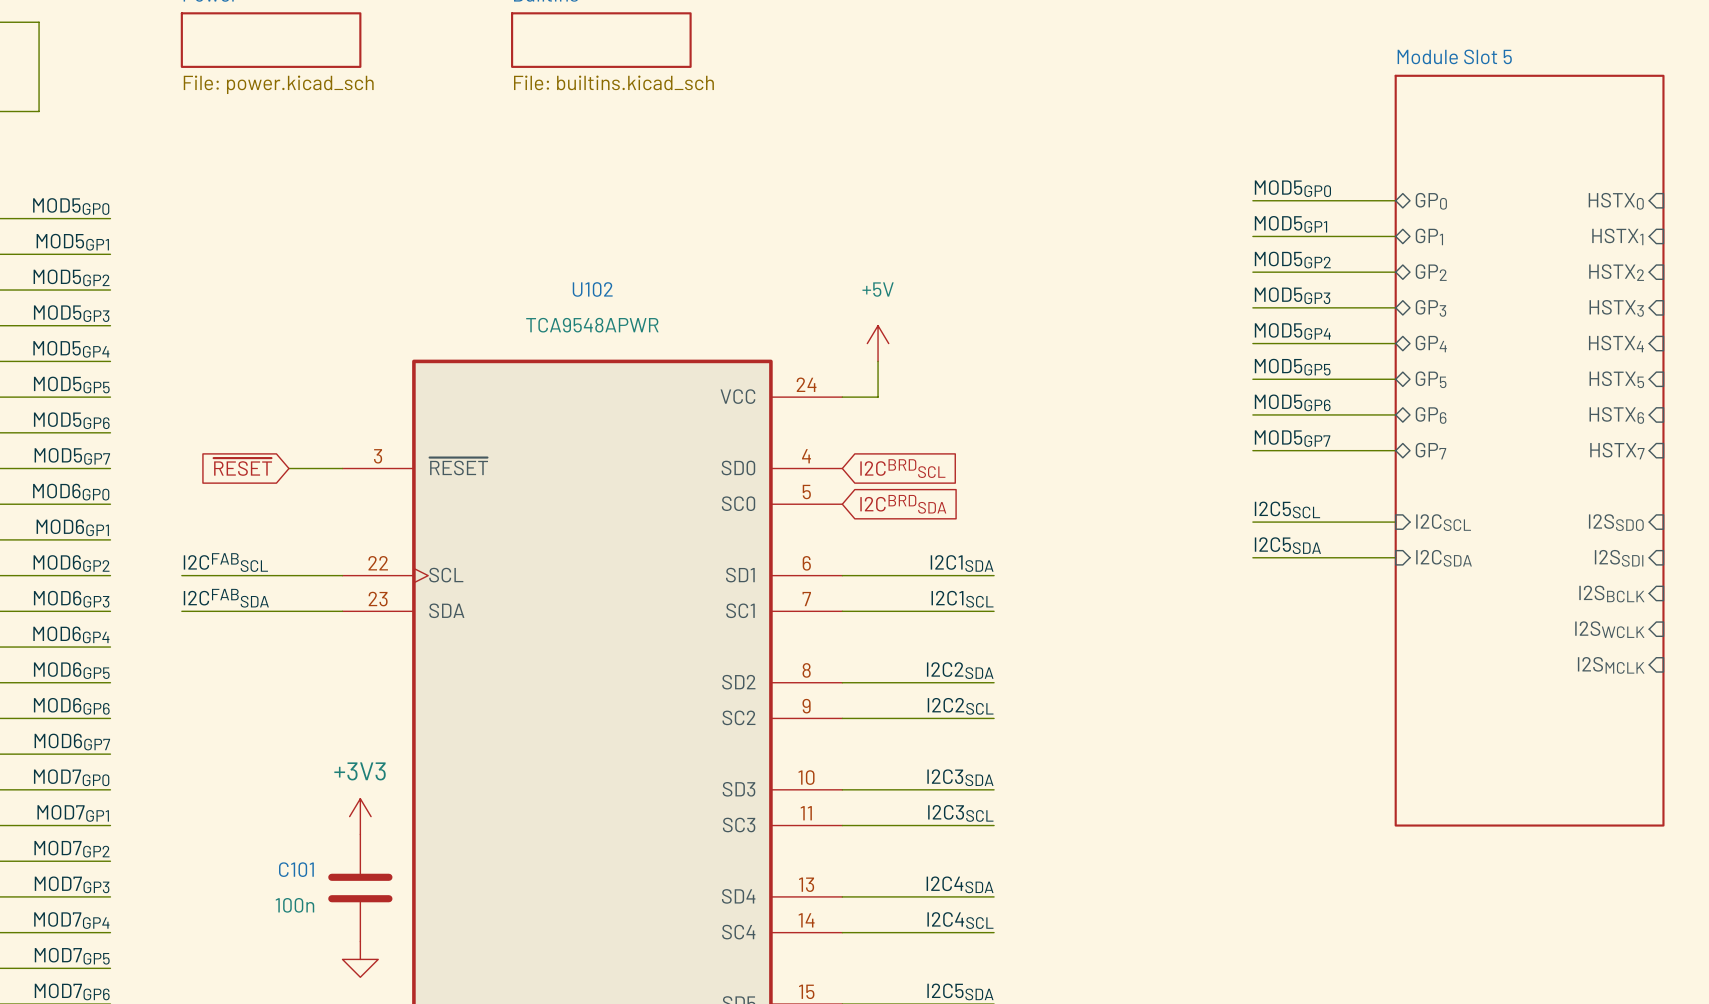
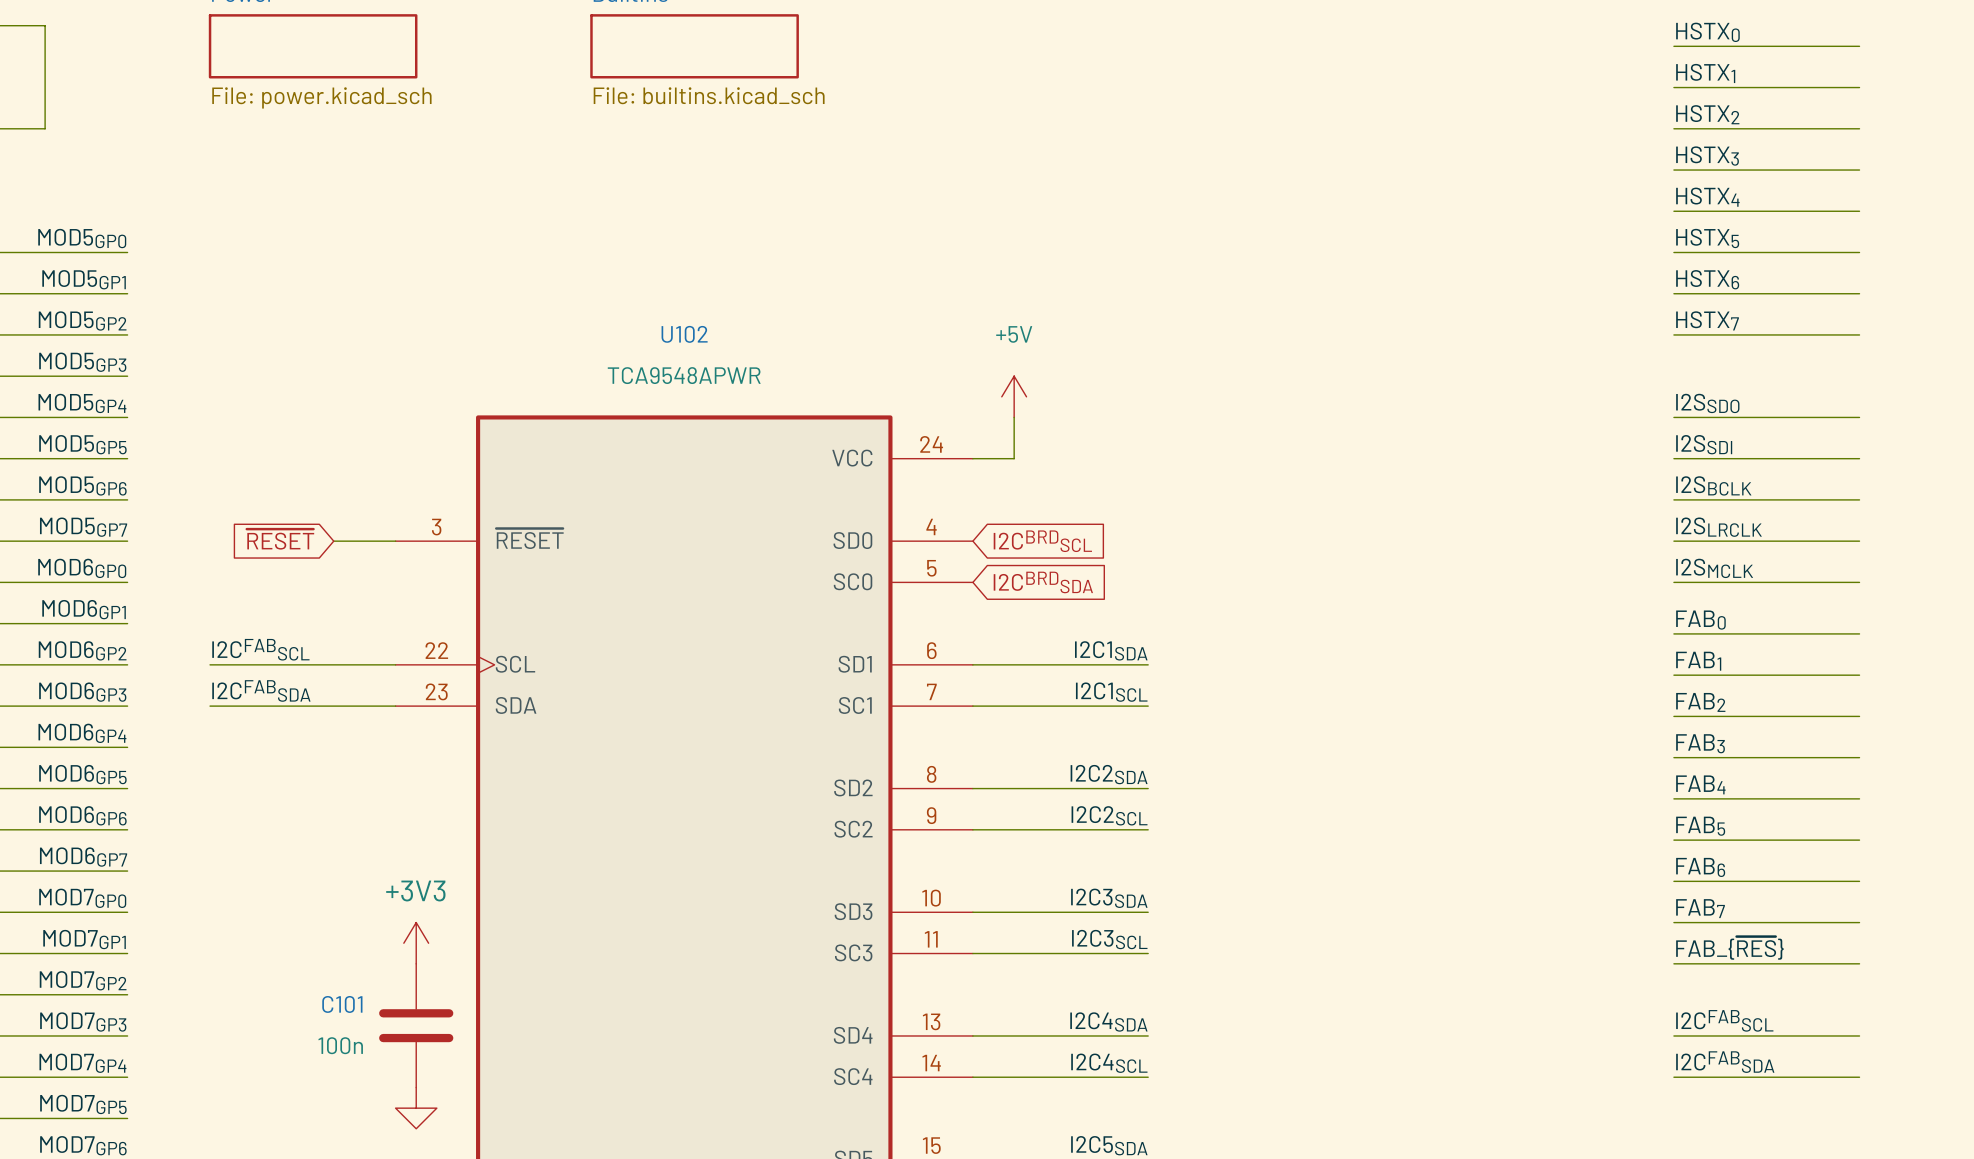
label: none -> HSTX0 (1707, 32)
wire: none -> (1673, 46) (1859, 46)
label: none -> HSTX1 (1705, 73)
label: none -> HSTX2 (1707, 114)
wire: none -> (1673, 128) (1859, 128)
label: none -> HSTX3 (1707, 156)
wire: none -> (1673, 170) (1859, 170)
label: none -> HSTX4 (1707, 197)
wire: none -> (1673, 211) (1859, 211)
label: MOD5GP0 (1292, 188) -> none
wire: (1252, 200) (1395, 200) -> none
sheet pin: GP0 (1431, 201) -> none
sheet pin: HSTX0 (1616, 201) -> none
label: none -> HSTX5 (1707, 238)
wire: none -> (1673, 252) (1859, 252)
label: MOD5GP1 (1290, 224) -> none
wire: (1252, 236) (1395, 236) -> none
sheet pin: GP1 (1429, 236) -> none
sheet pin: HSTX1 (1617, 236) -> none
label: none -> HSTX6 (1707, 279)
wire: none -> (1673, 293) (1859, 293)
label: MOD5GP2 (1292, 260) -> none
wire: (1252, 272) (1395, 272) -> none
sheet pin: GP2 (1431, 272) -> none
sheet pin: HSTX2 (1616, 272) -> none
label: none -> HSTX7 (1707, 320)
wire: none -> (1673, 334) (1859, 334)
label: MOD5GP3 (1292, 295) -> none
wire: (1252, 307) (1395, 307) -> none
sheet pin: GP3 (1430, 308) -> none
sheet pin: HSTX3 (1616, 308) -> none
label: MOD5GP4 (1292, 331) -> none
wire: (1252, 343) (1395, 343) -> none
sheet pin: GP4 (1431, 344) -> none
sheet pin: HSTX4 (1616, 344) -> none
label: none -> I2SSDO (1707, 403)
wire: none -> (1673, 417) (1859, 417)
label: MOD5GP5 (1292, 367) -> none
wire: (1252, 379) (1395, 379) -> none
sheet pin: GP5 (1431, 379) -> none
sheet pin: HSTX5 (1616, 379) -> none
label: none -> I2SSDI (1704, 444)
wire: none -> (1673, 458) (1859, 458)
label: MOD5GP6 (1292, 402) -> none
wire: (1252, 414) (1395, 414) -> none
sheet pin: GP6 (1431, 415) -> none
sheet pin: HSTX6 (1616, 415) -> none
label: none -> I2SBCLK (1713, 485)
wire: none -> (1673, 499) (1859, 499)
label: MOD5GP7 (1292, 438) -> none
wire: (1252, 450) (1395, 450) -> none
sheet Module Slot 5: (1529, 450) -> none
sheet pin: GP7 (1430, 451) -> none
sheet pin: HSTX7 (1617, 451) -> none
label: none -> I2SLRCLK (1718, 527)
wire: none -> (1673, 541) (1859, 541)
label: none -> I2SMCLK (1714, 568)
wire: none -> (1673, 582) (1859, 582)
label: I2C5SCL (1287, 509) -> none
wire: (1252, 522) (1395, 522) -> none
sheet pin: I2CSCL (1443, 522) -> none
sheet pin: I2SSDO (1616, 522) -> none
label: none -> FAB0 (1700, 620)
label: I2C5SDA (1287, 545) -> none
wire: none -> (1673, 633) (1859, 633)
wire: (1252, 557) (1395, 557) -> none
sheet pin: I2CSDA (1444, 558) -> none
sheet pin: I2SSDI (1619, 558) -> none
label: none -> FAB1 (1698, 661)
wire: none -> (1673, 675) (1859, 675)
sheet pin: I2SBCLK (1611, 594) -> none
label: none -> FAB2 (1700, 702)
wire: none -> (1673, 716) (1859, 716)
sheet pin: I2SWCLK (1609, 629) -> none
label: none -> FAB3 (1700, 743)
wire: none -> (1673, 757) (1859, 757)
sheet pin: I2SMCLK (1611, 665) -> none
label: none -> FAB4 (1700, 784)
wire: none -> (1673, 798) (1859, 798)
label: none -> FAB5 (1700, 826)
wire: none -> (1673, 840) (1859, 840)
label: none -> FAB6 (1700, 867)
wire: none -> (1673, 881) (1859, 881)
label: none -> FAB7 (1700, 908)
wire: none -> (1673, 922) (1859, 922)
label: none -> FAB_{~{RES}} (1729, 948)
wire: none -> (1673, 963) (1859, 963)
label: none -> I2CFABSCL (1724, 1020)
wire: none -> (1673, 1035) (1859, 1035)
label: none -> I2CFABSDA (1725, 1062)
wire: none -> (1673, 1077) (1859, 1077)

